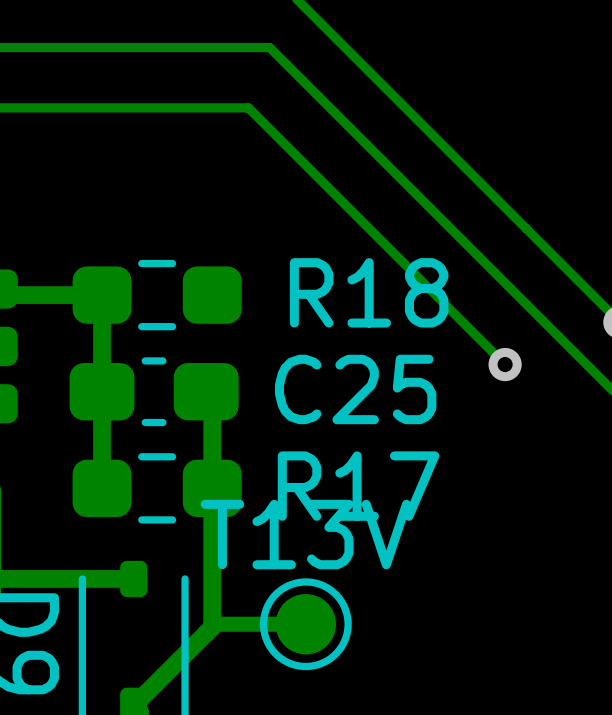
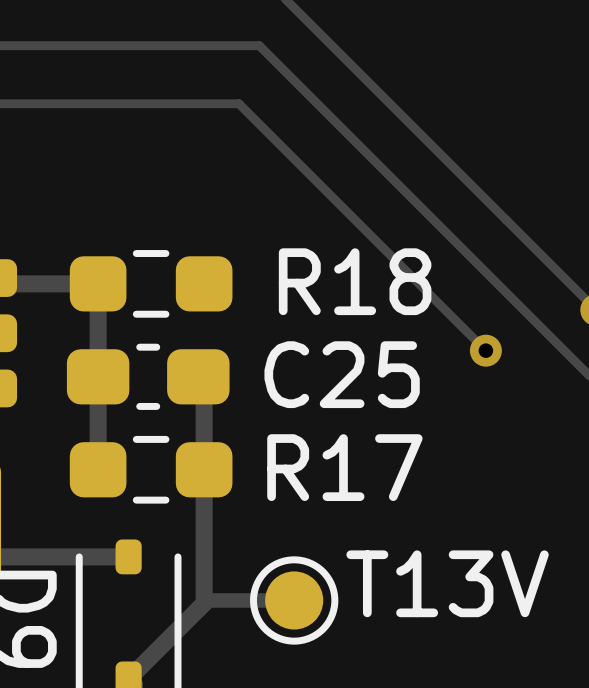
T13V name position: T13V (305, 534) -> T13V (447, 583)

